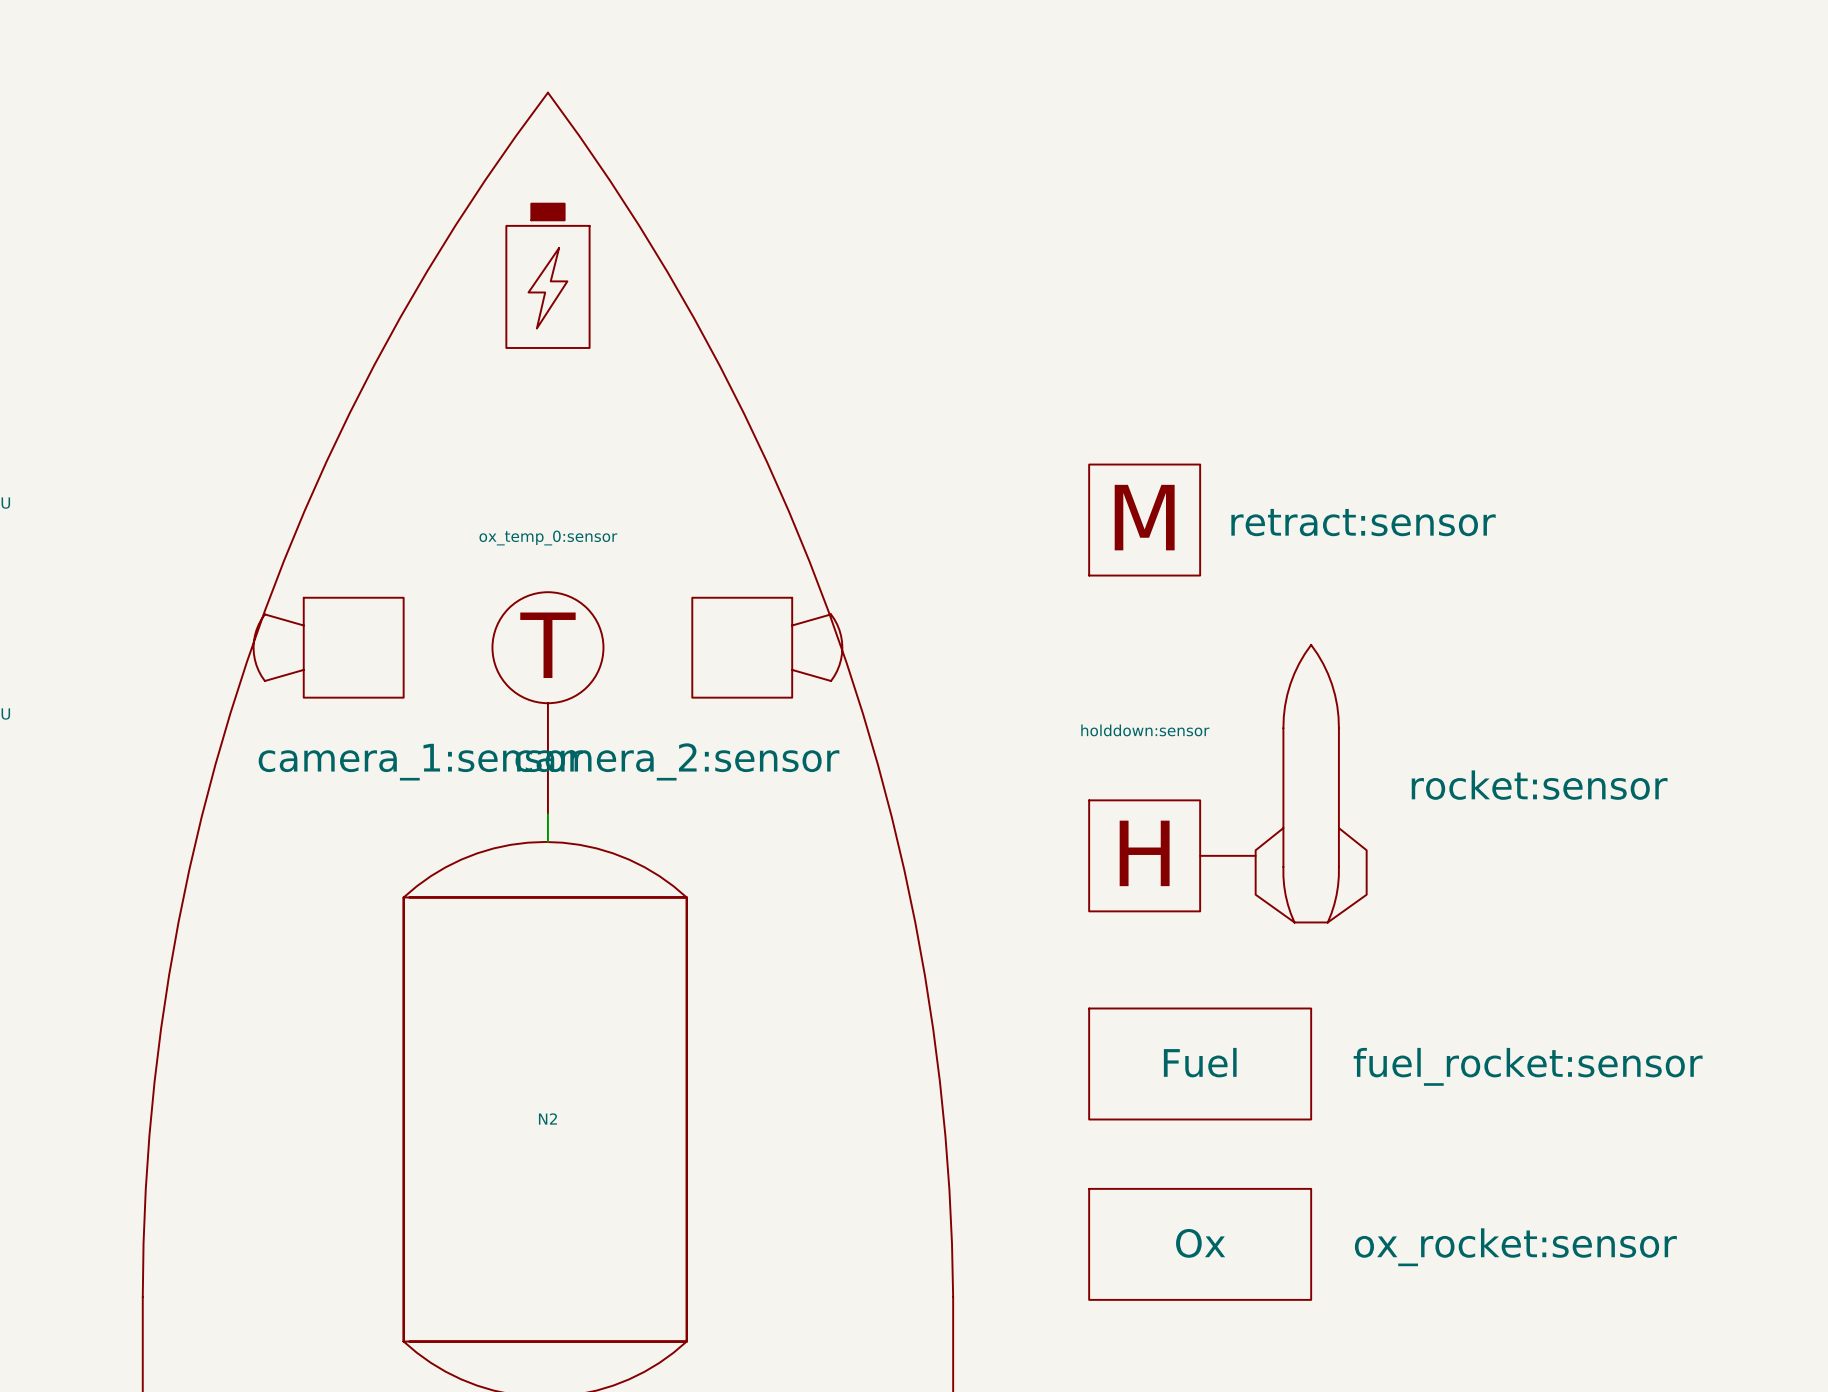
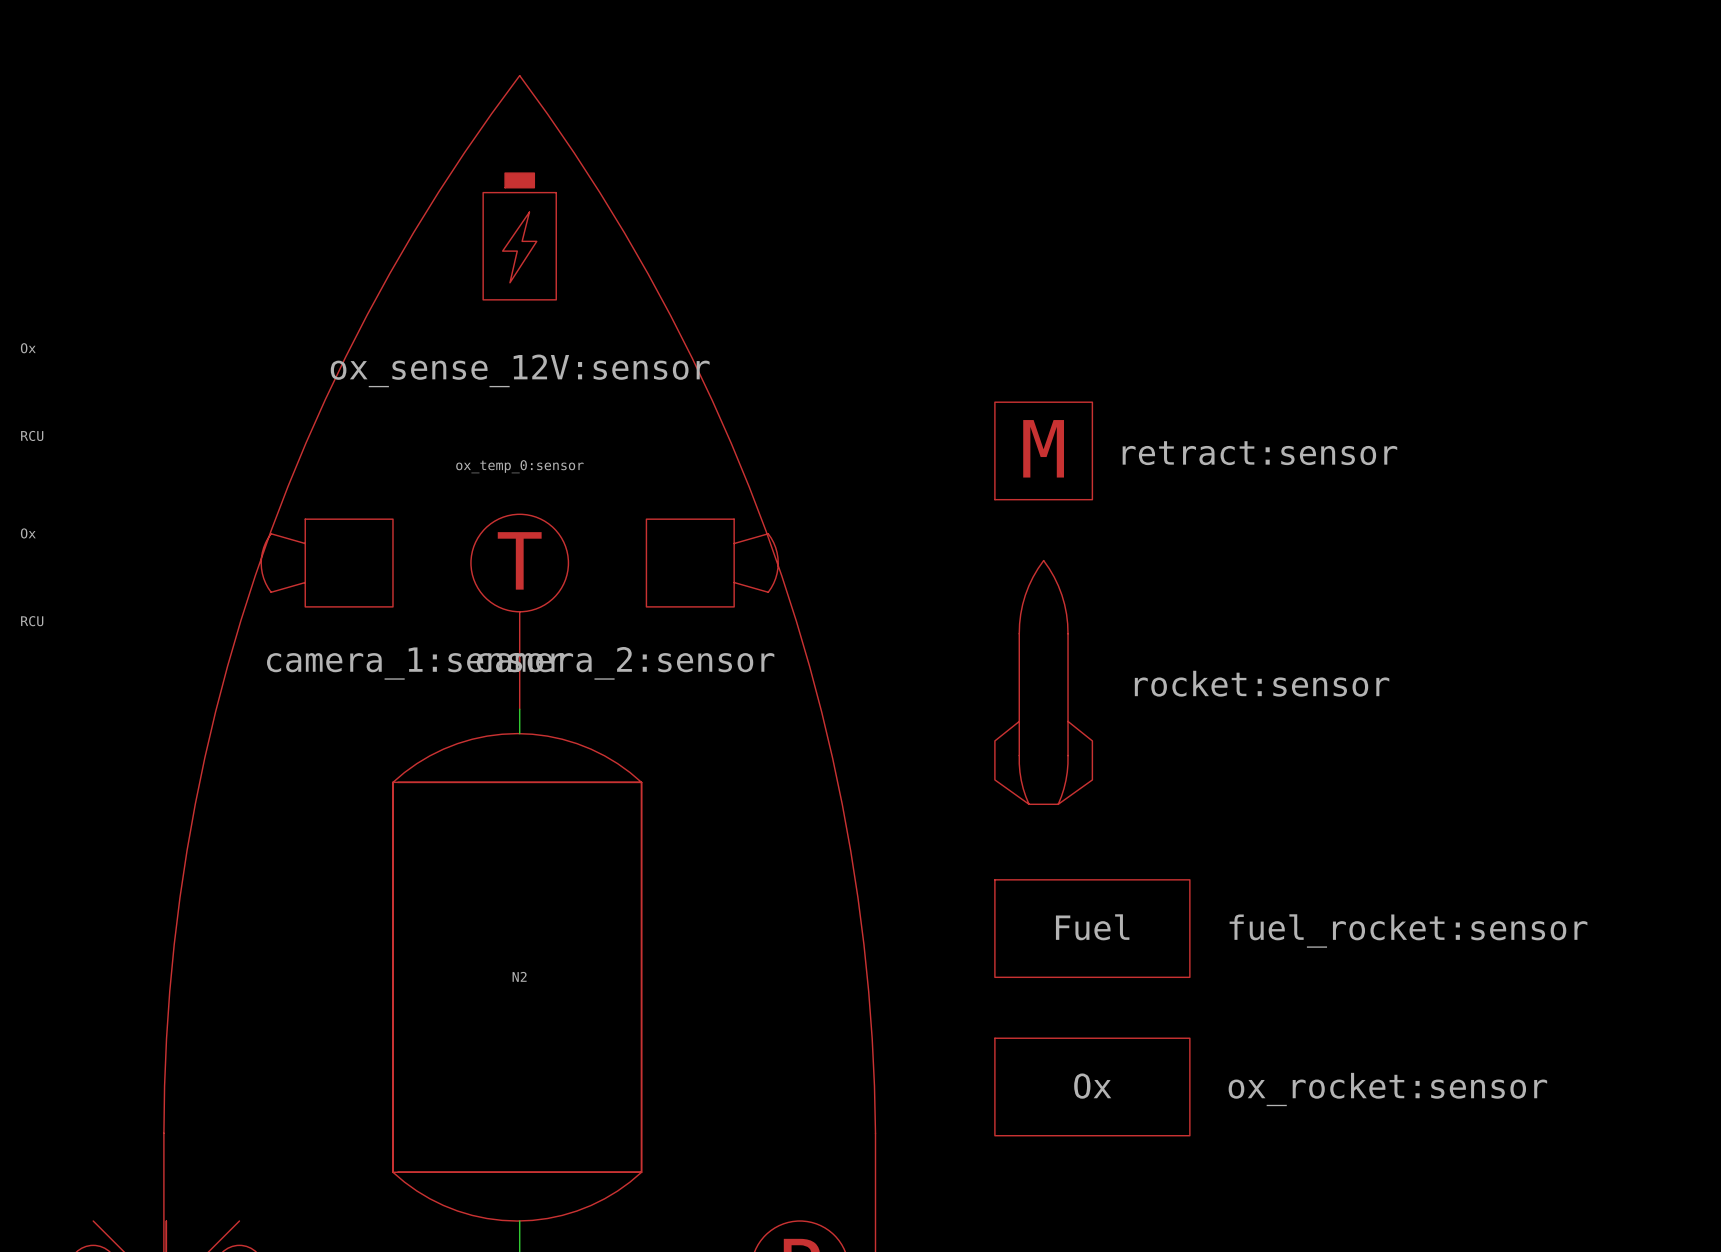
part value: none -> ox_sense_12V:sensor (520, 370)
part position: (1311, 783) -> (1043, 682)
part: holddown:sensor (1172, 855) -> none

